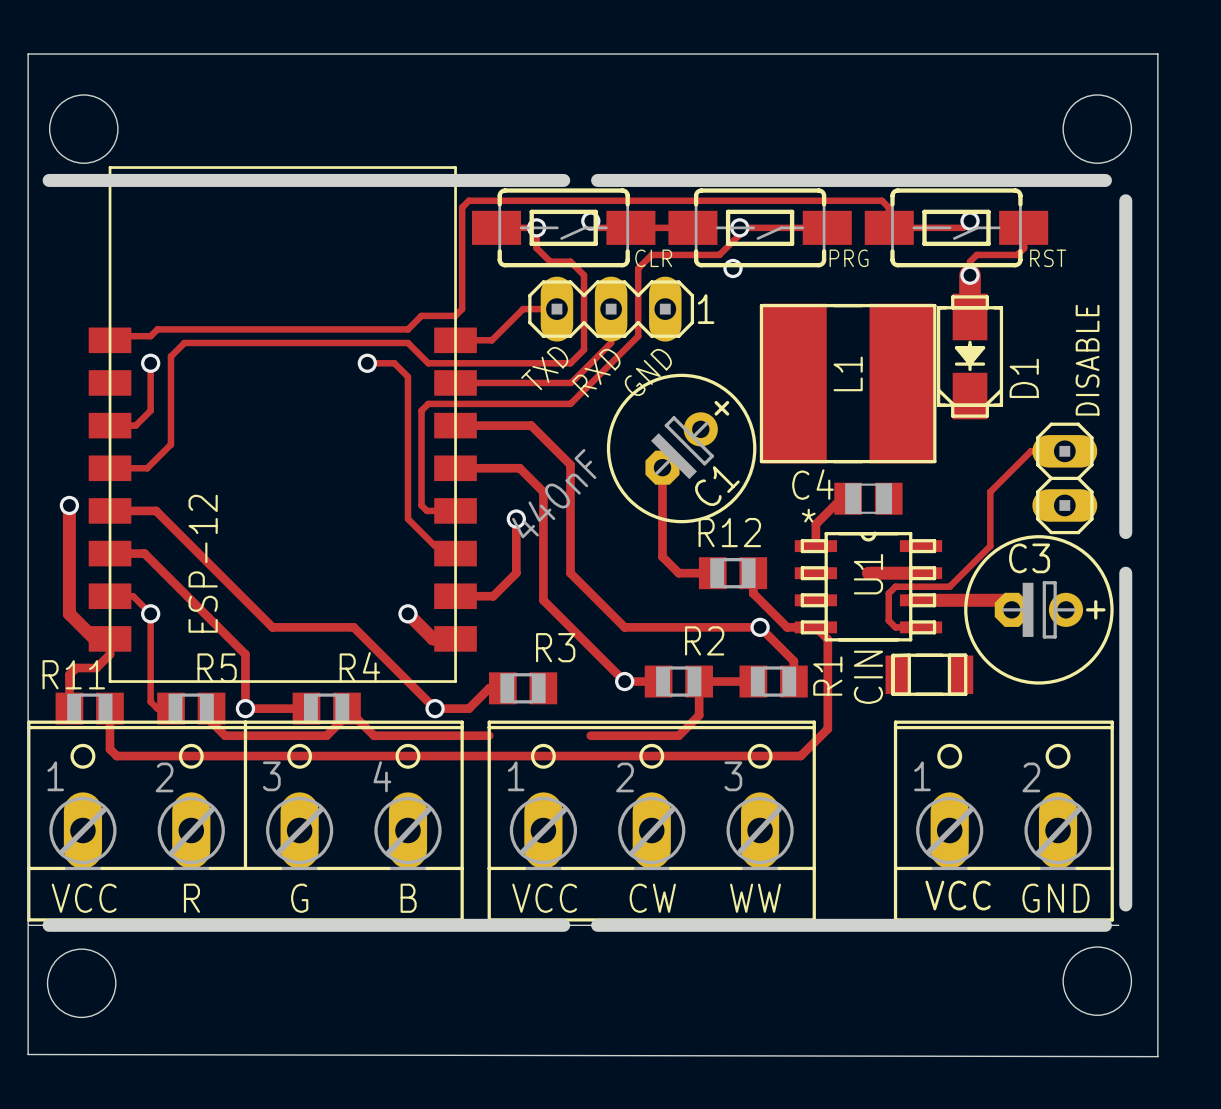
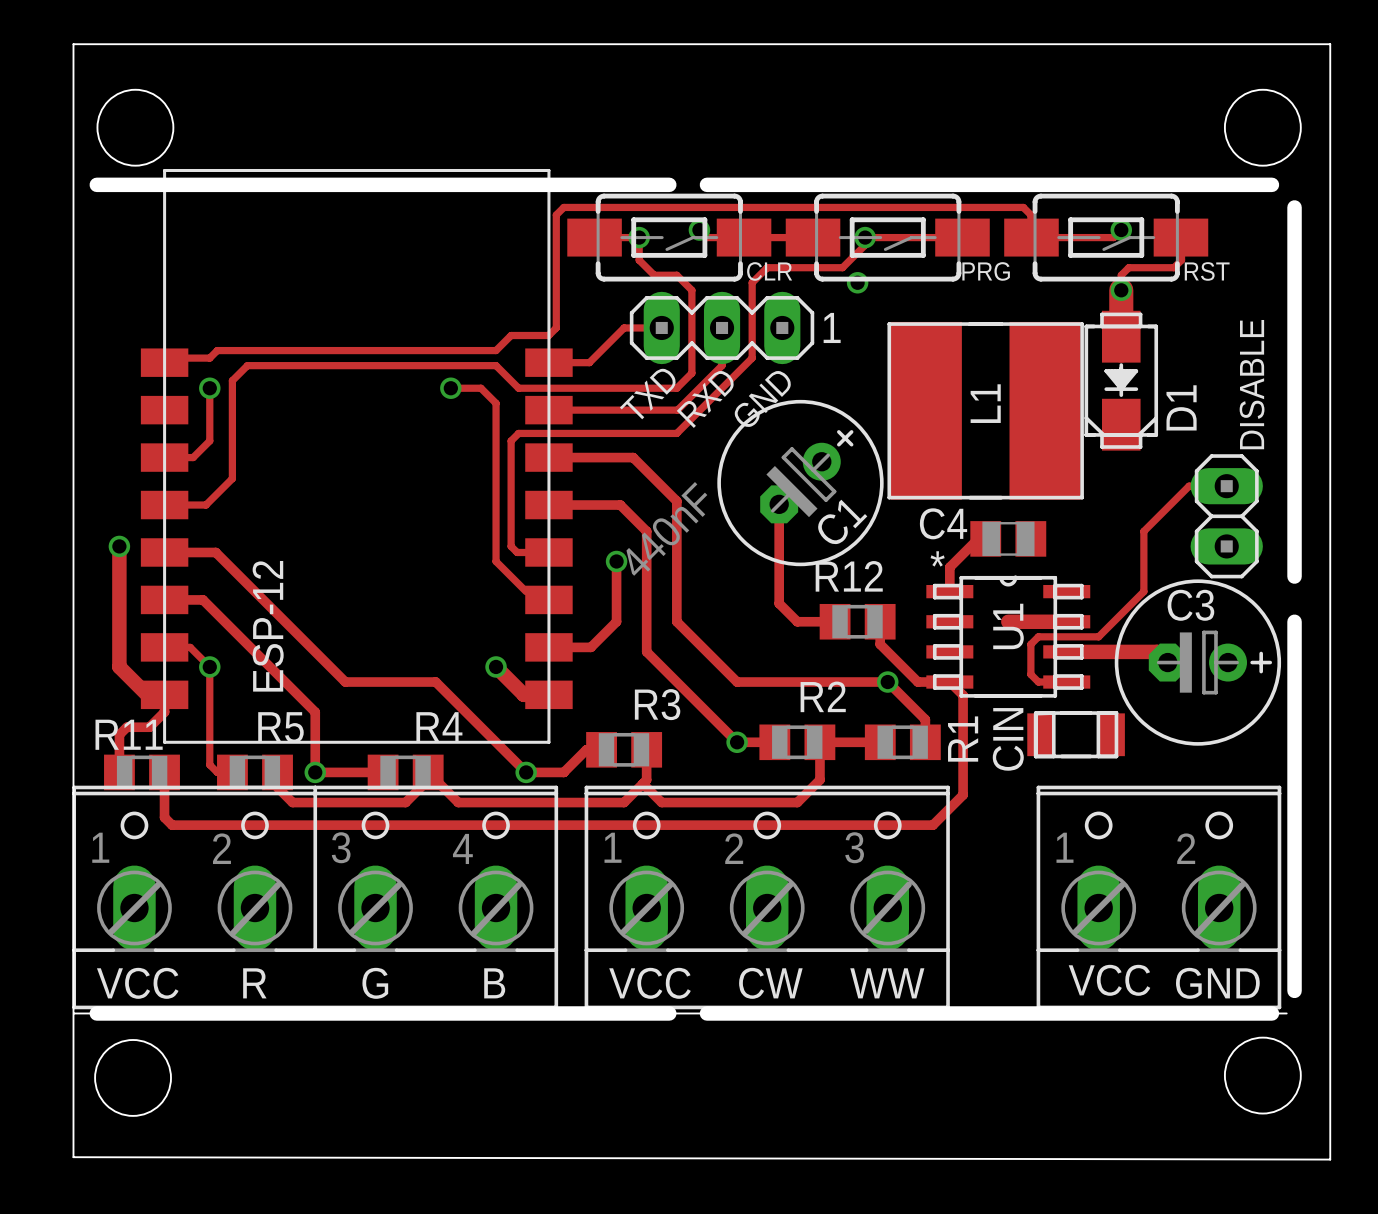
track: none -> (646, 749) (646, 780) (624, 802) (586, 802)
track: none -> (642, 783) (661, 802) (699, 802)

